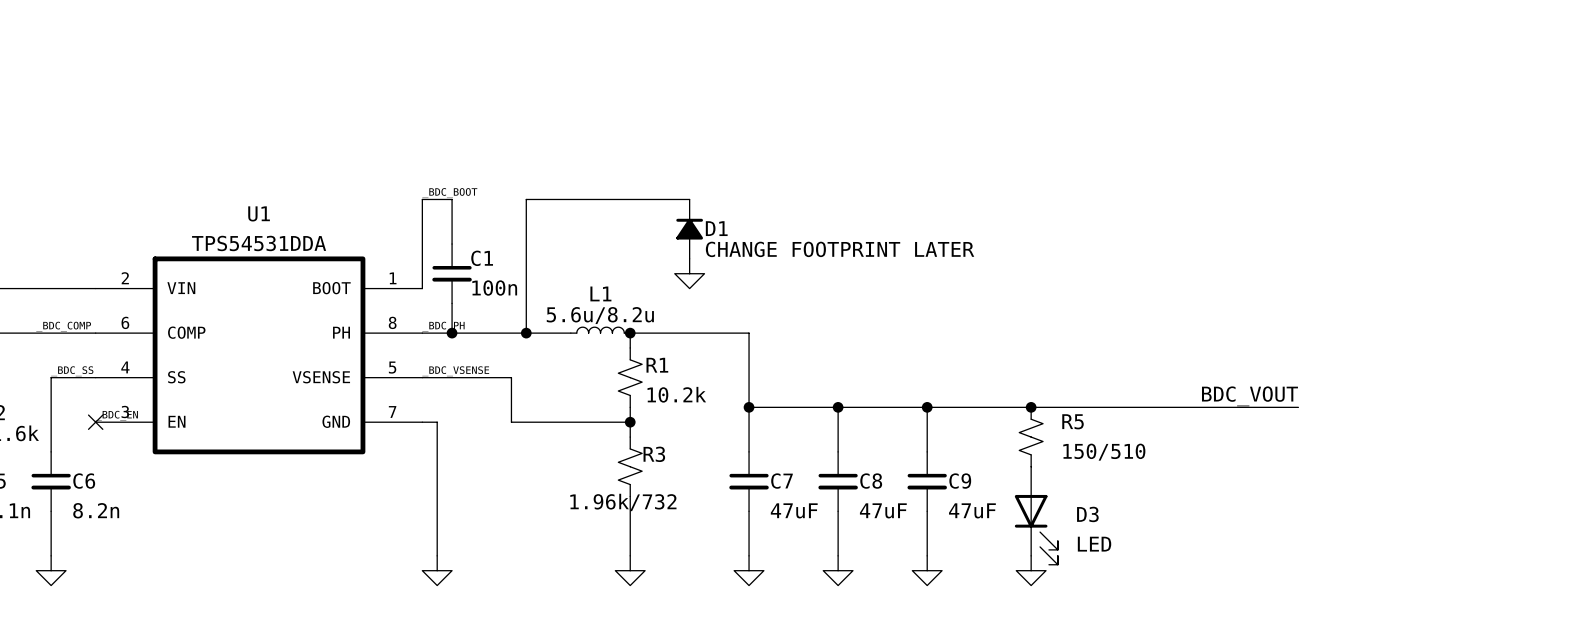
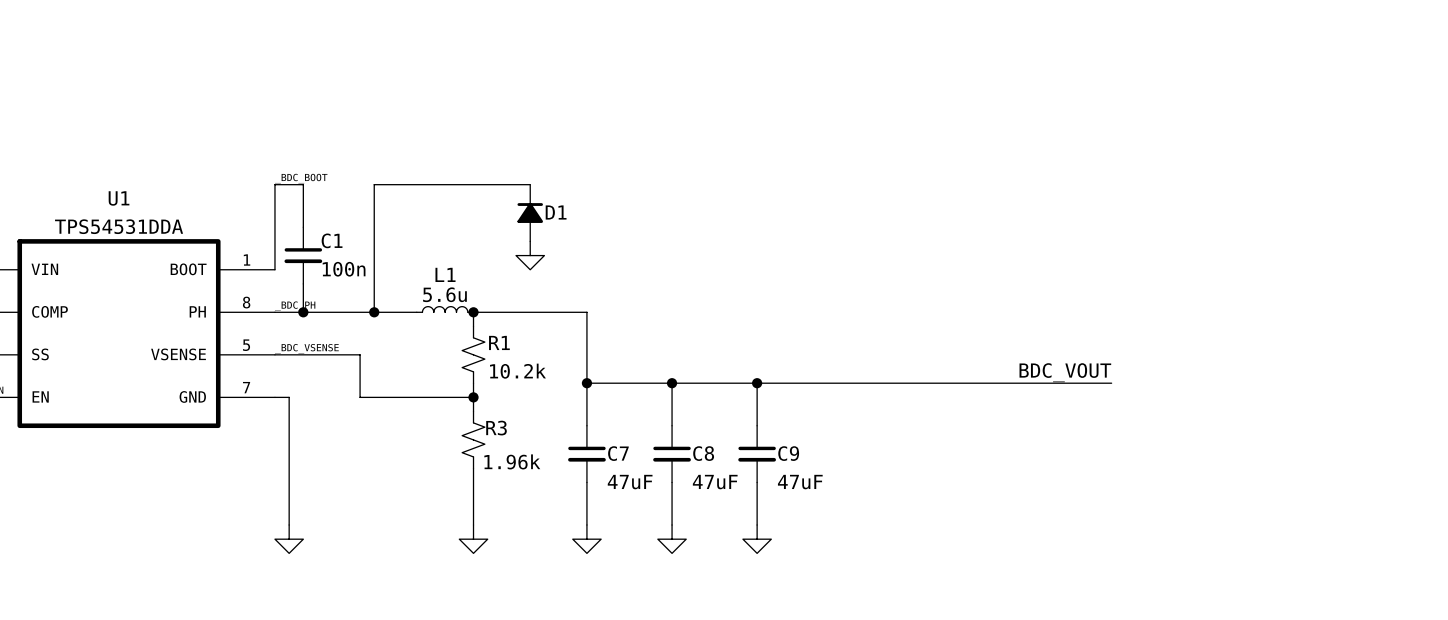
D1 value: CHANGE FOOTPRINT LATER (840, 249) -> none
L1 value: 5.6u/8.2u (600, 315) -> 5.6u (444, 294)
junction: (1031, 407) -> none
R5: 150/510 (1031, 437) -> none
R3 value: 1.96k/732 (623, 502) -> 1.96k (512, 461)
D3: LED (1036, 515) -> none
power symbol: (1031, 570) -> none

